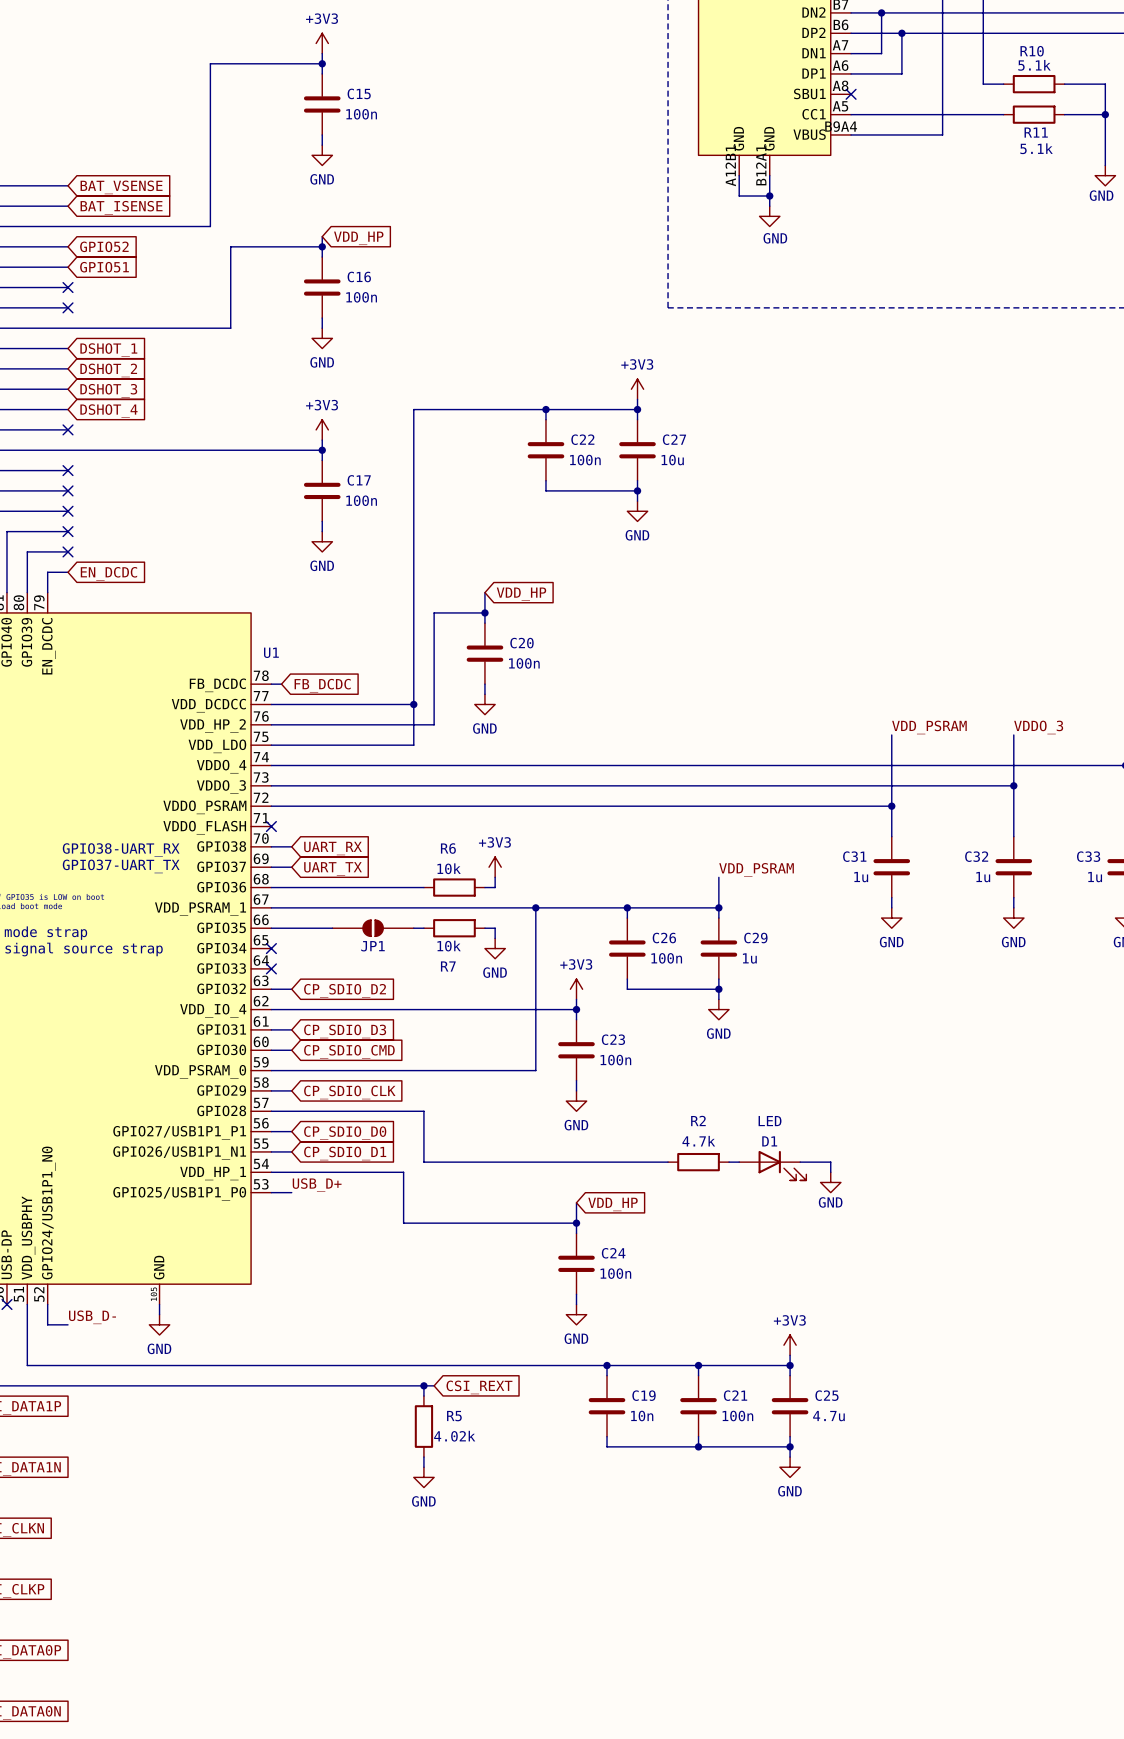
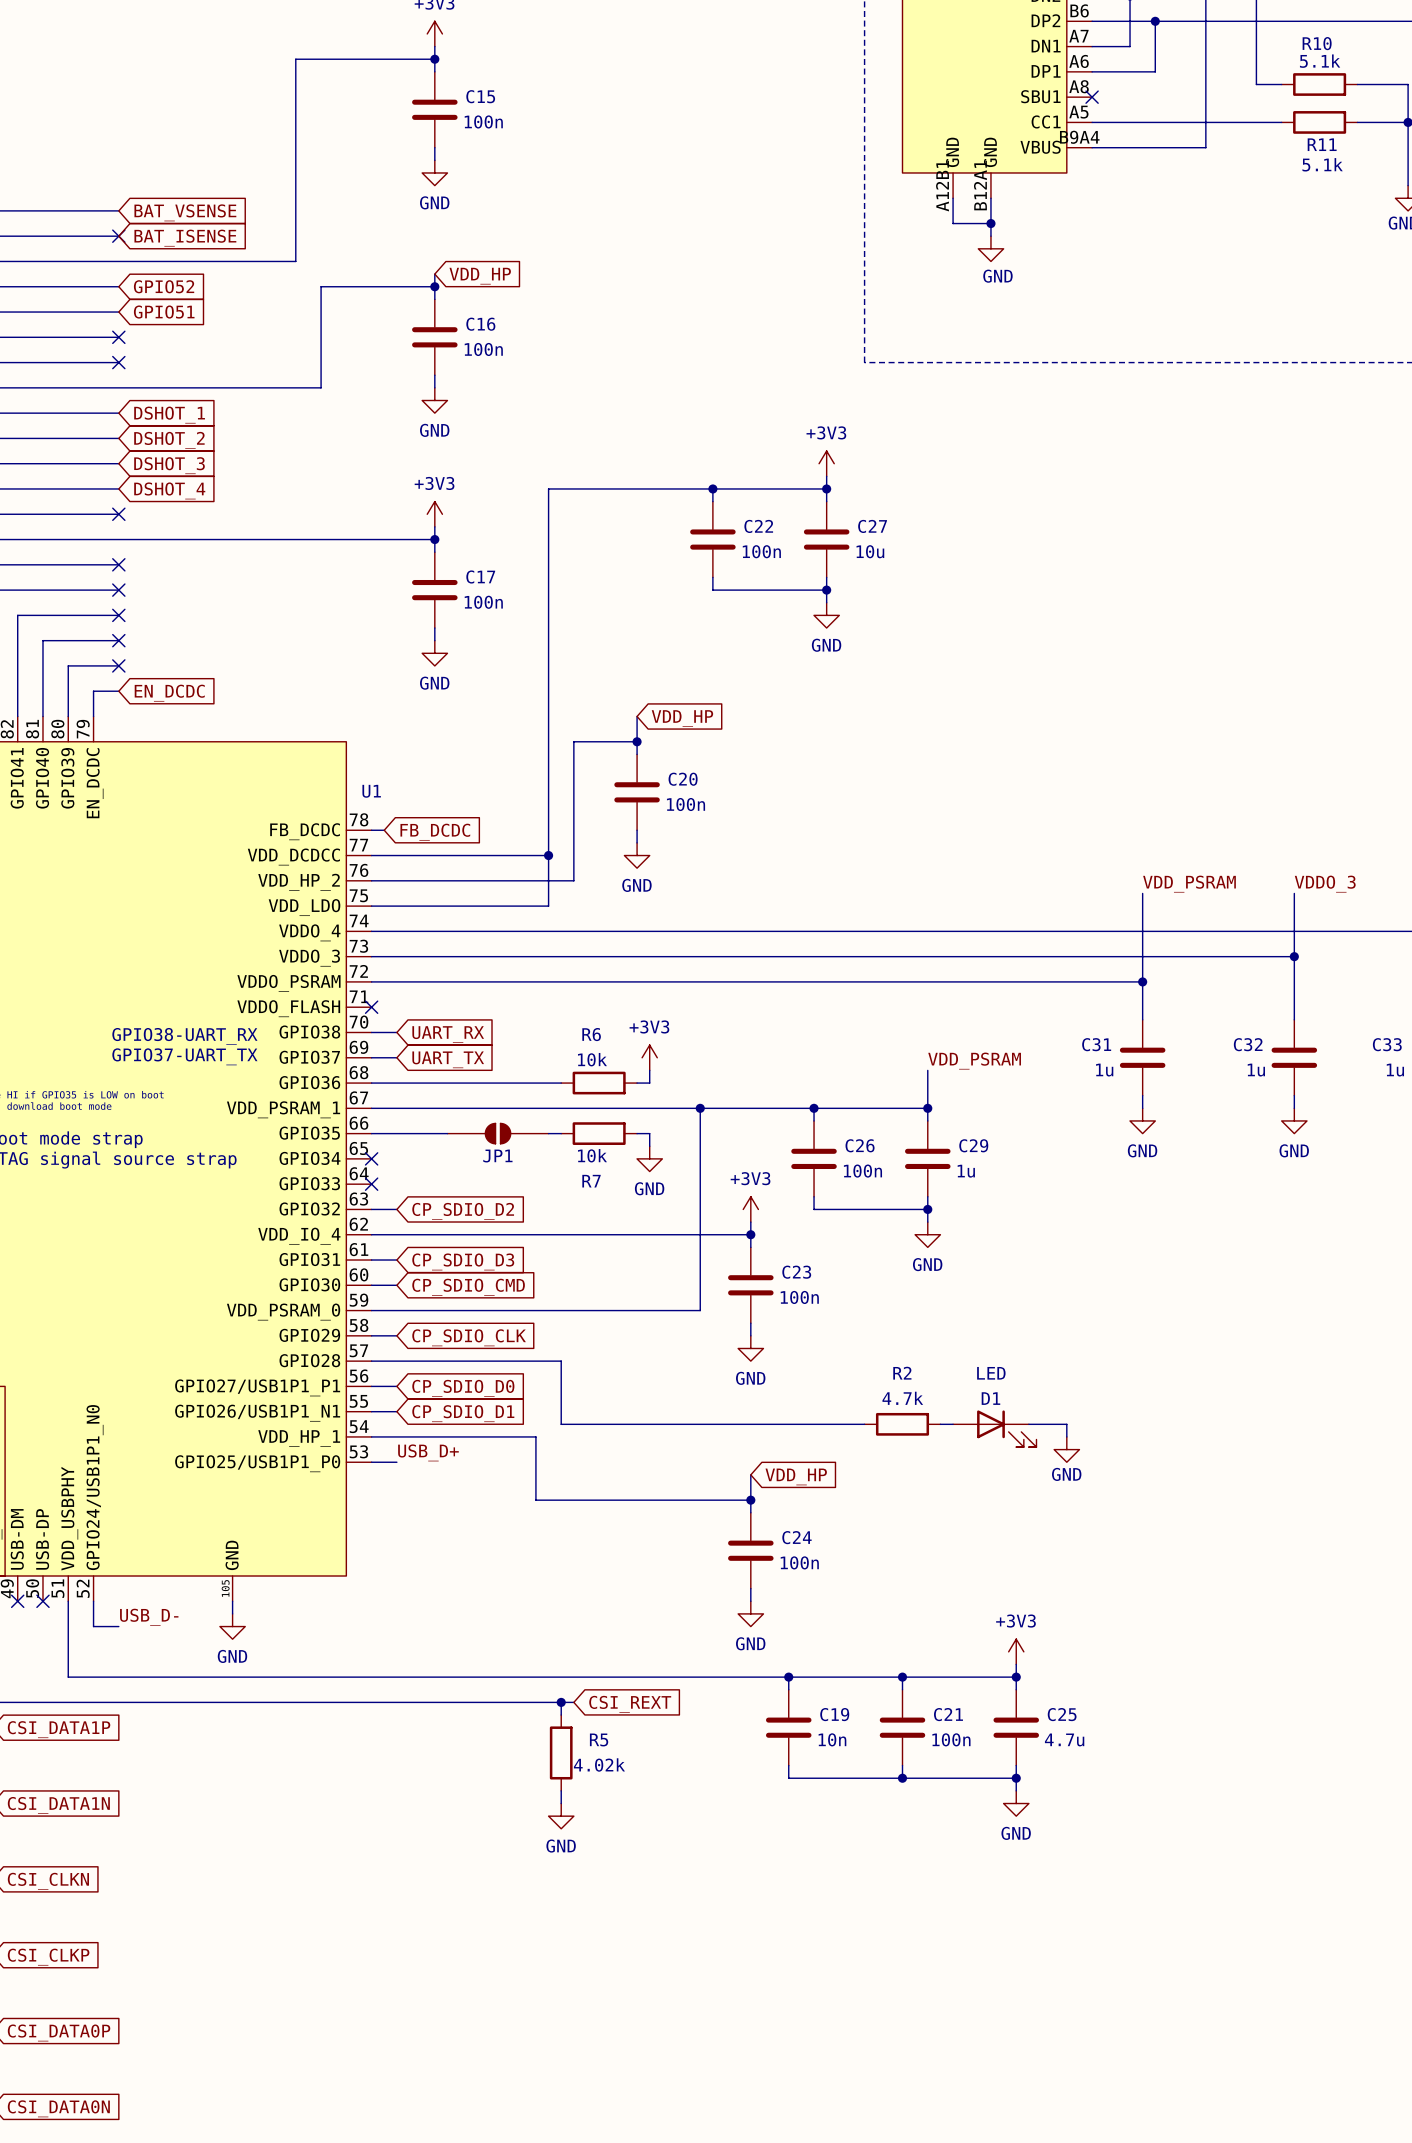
no-connect mark: none -> (118, 236)

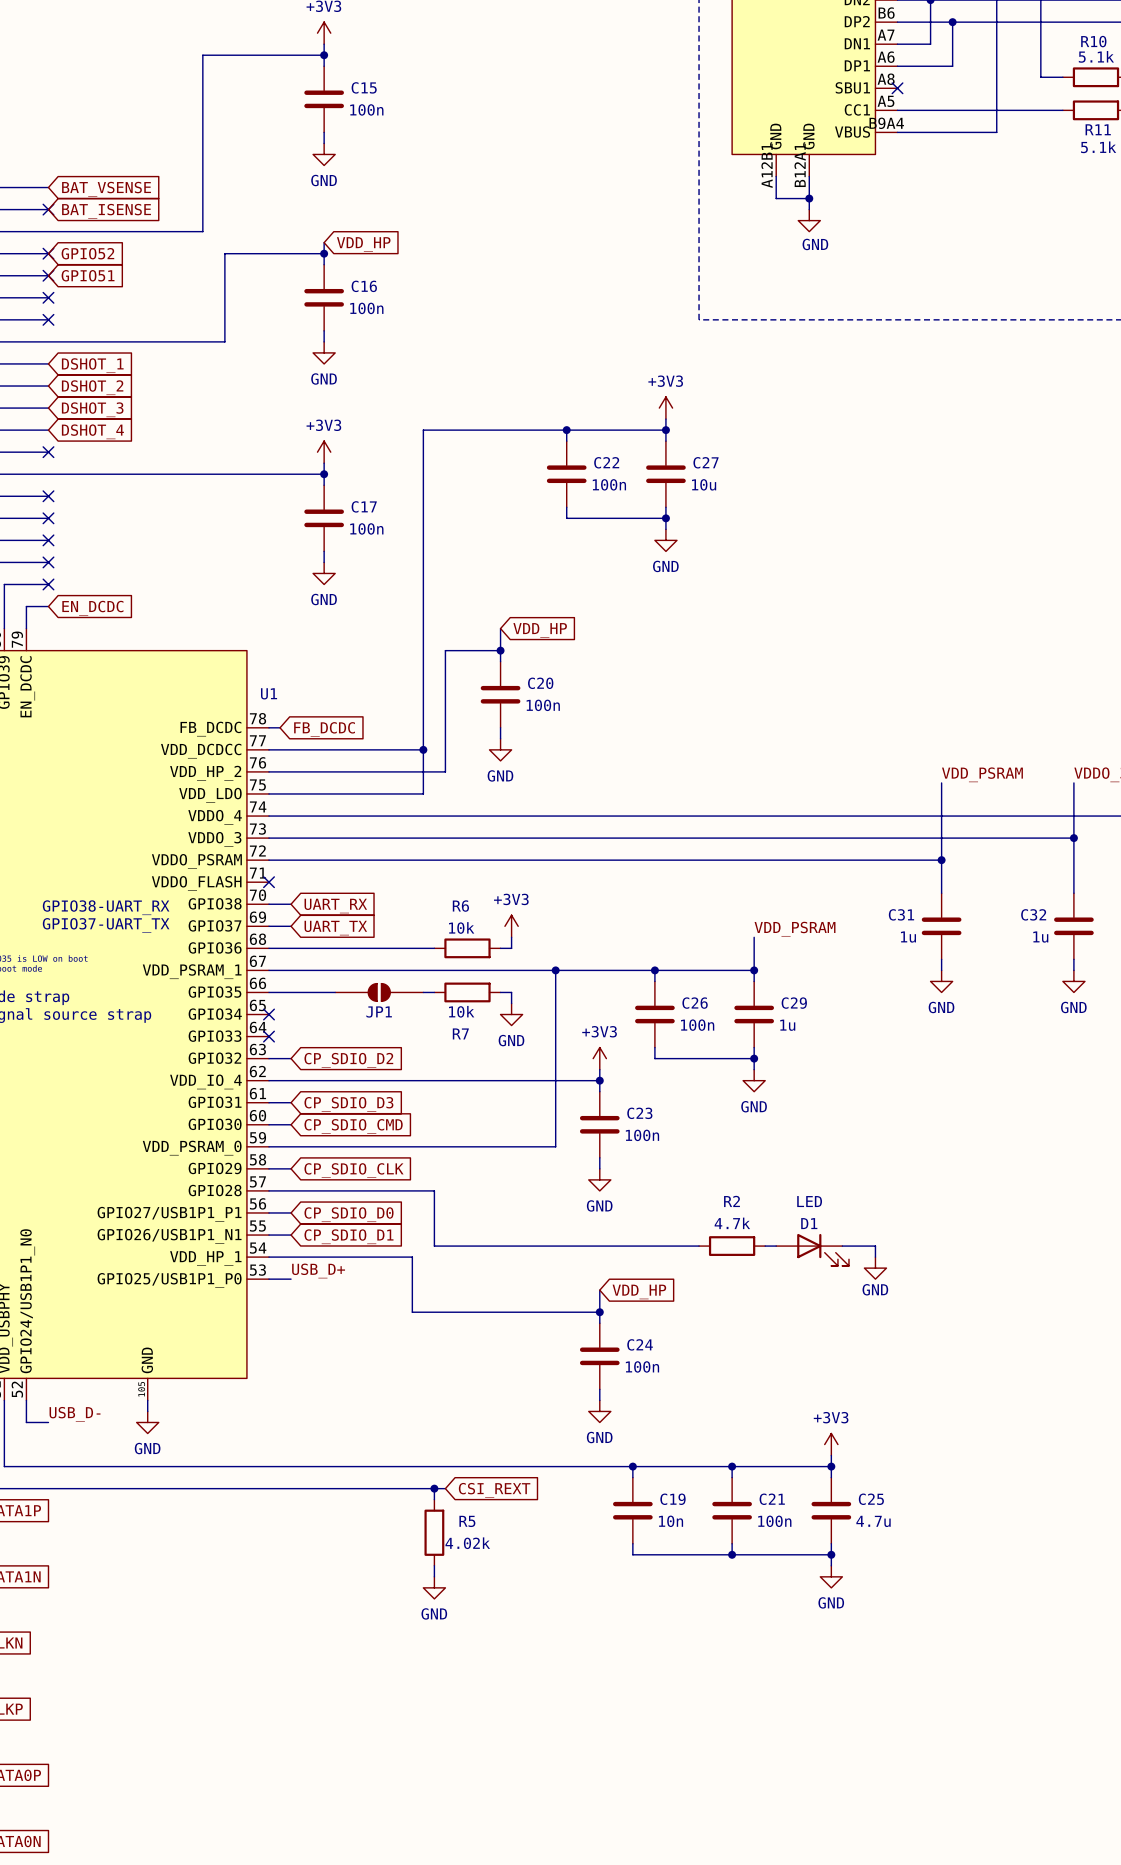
no-connect mark: none -> (48, 253)
no-connect mark: none -> (48, 275)

